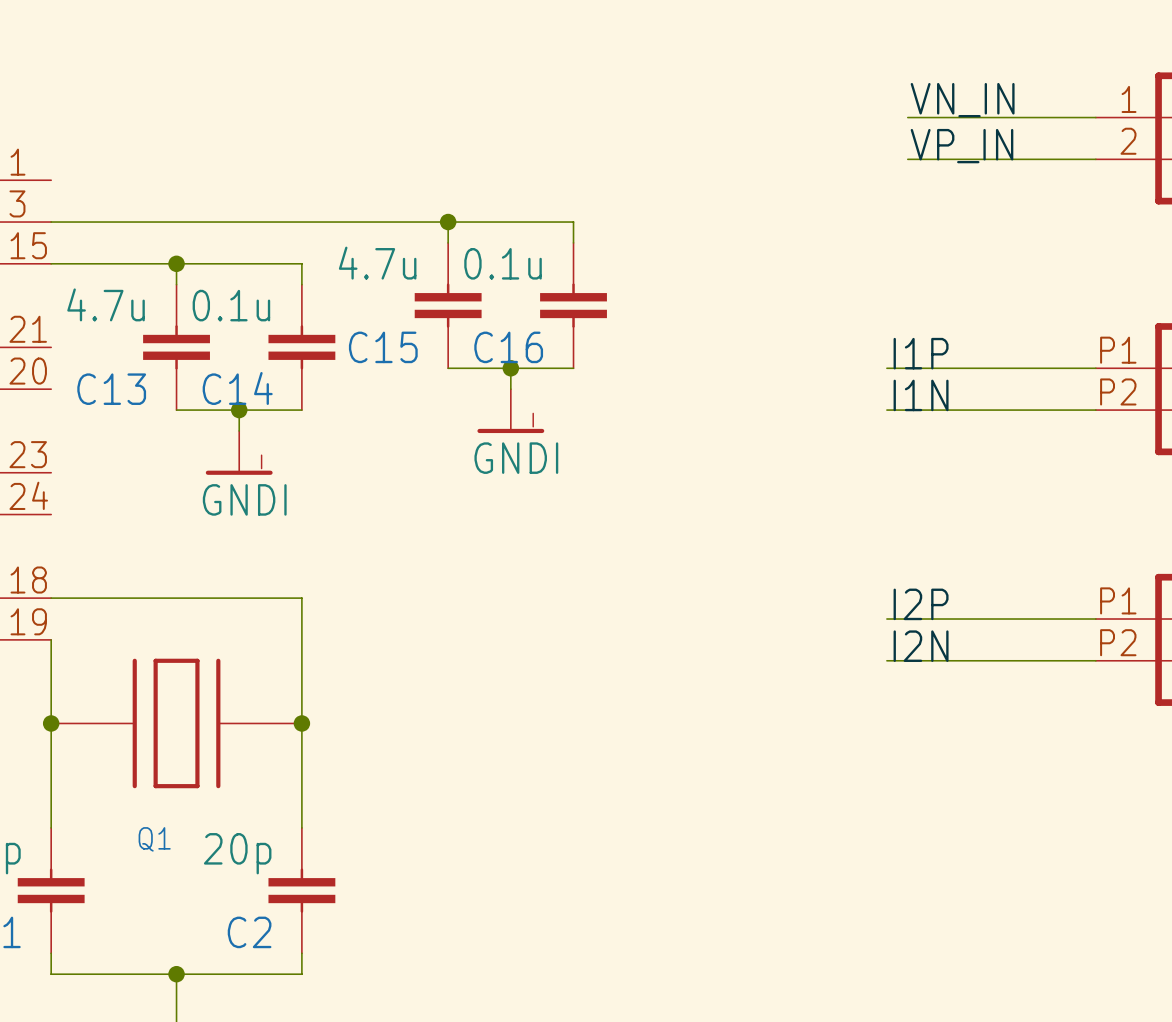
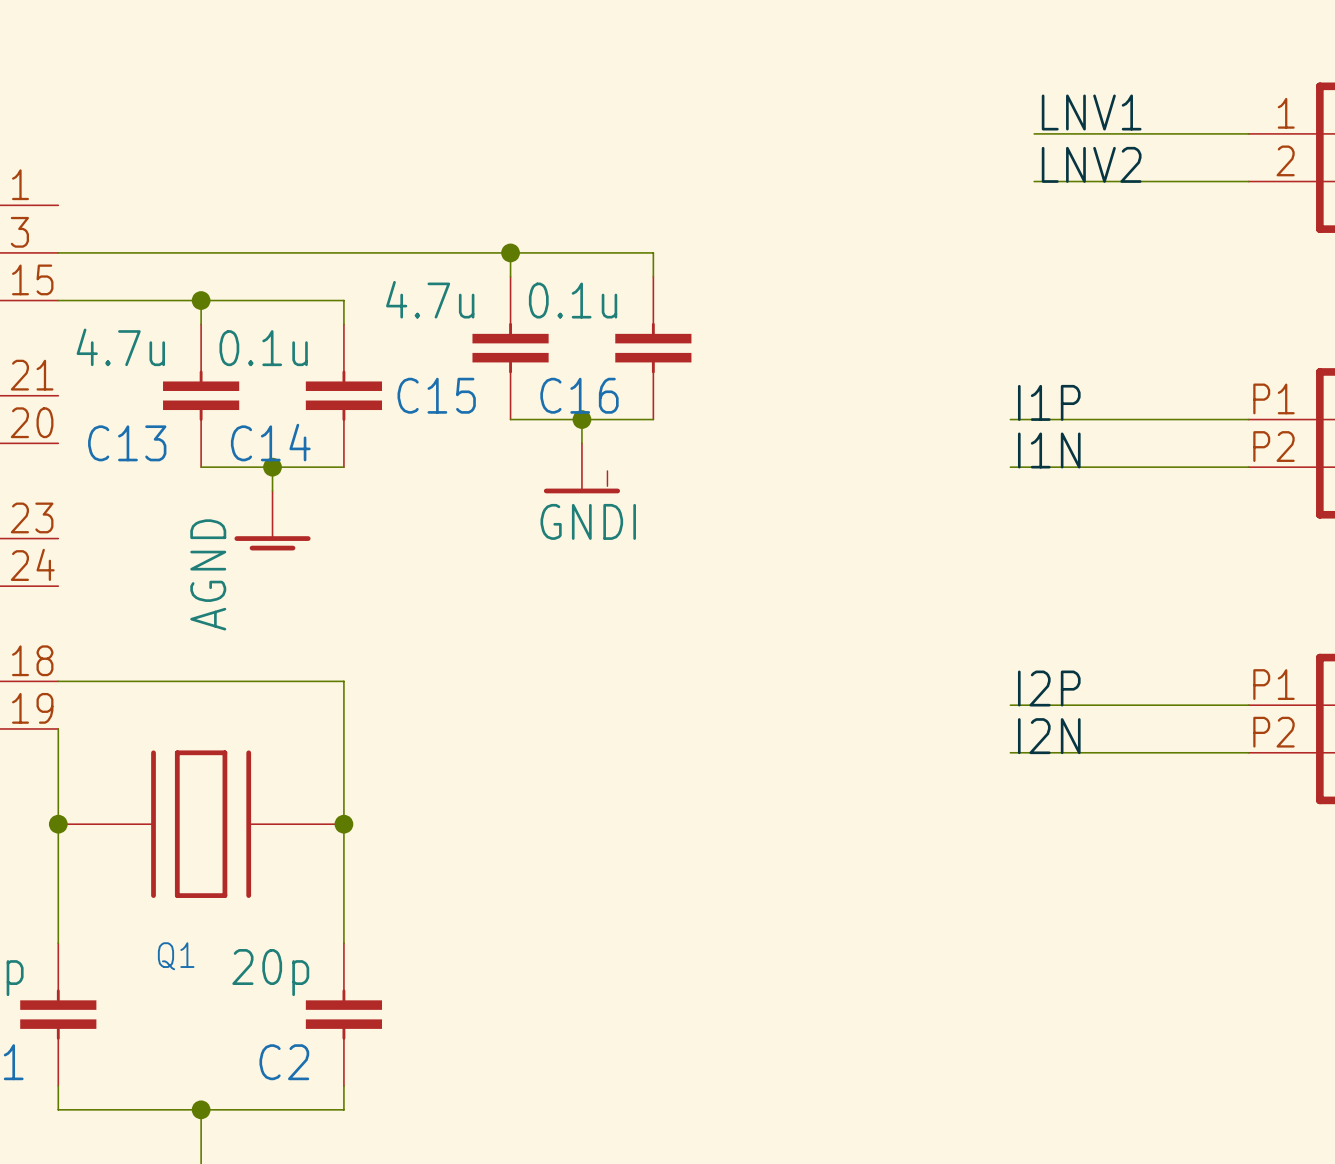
label: VN_IN (962, 100) -> LNV1 (1091, 112)
label: VP_IN (962, 146) -> LNV2 (1091, 164)
power symbol: GNDI (239, 452) -> AGND (272, 520)

